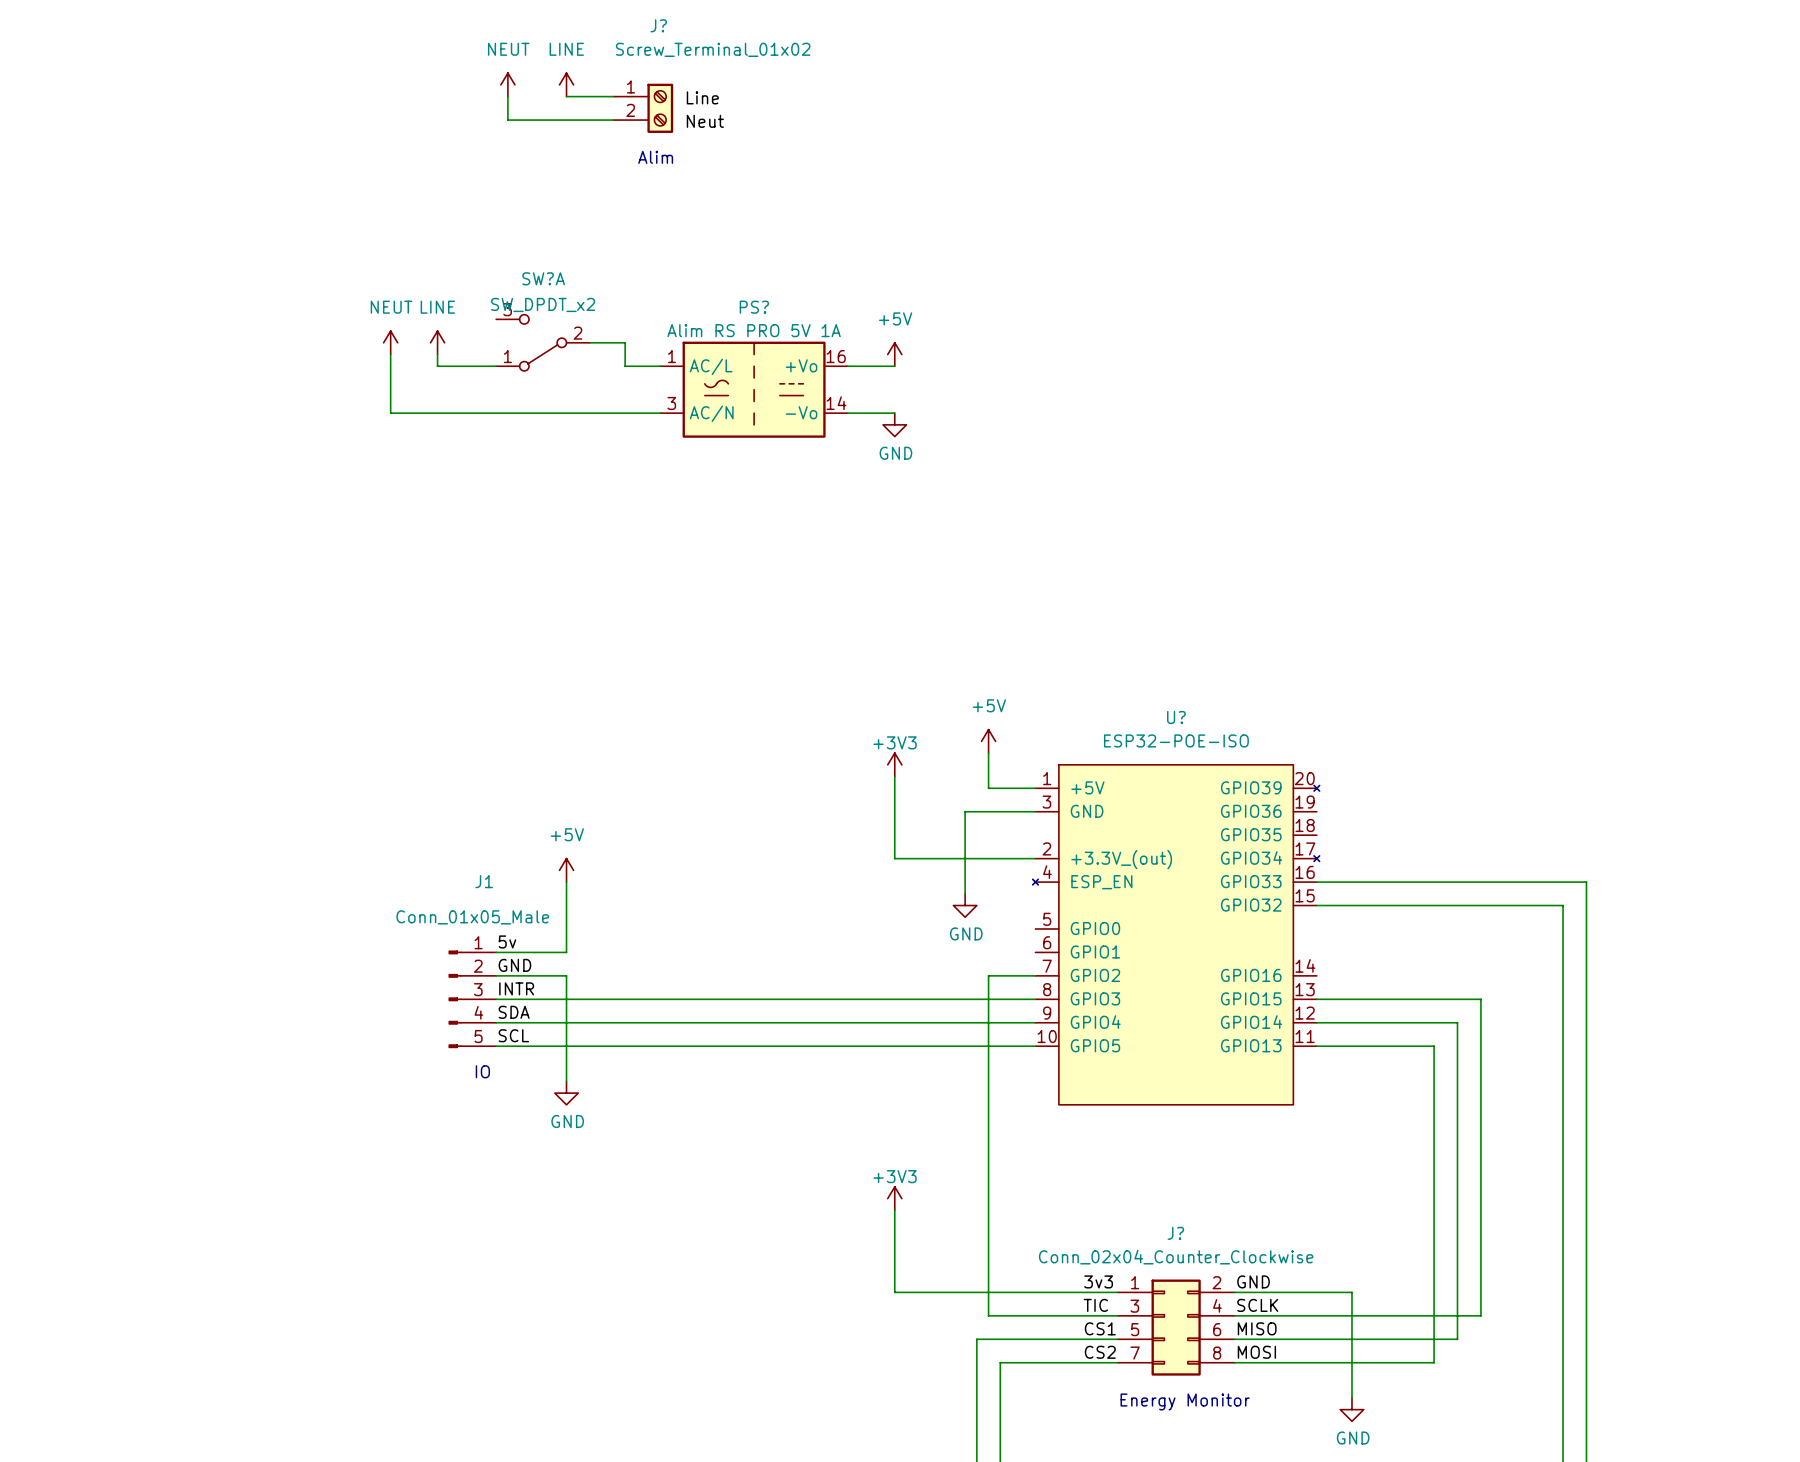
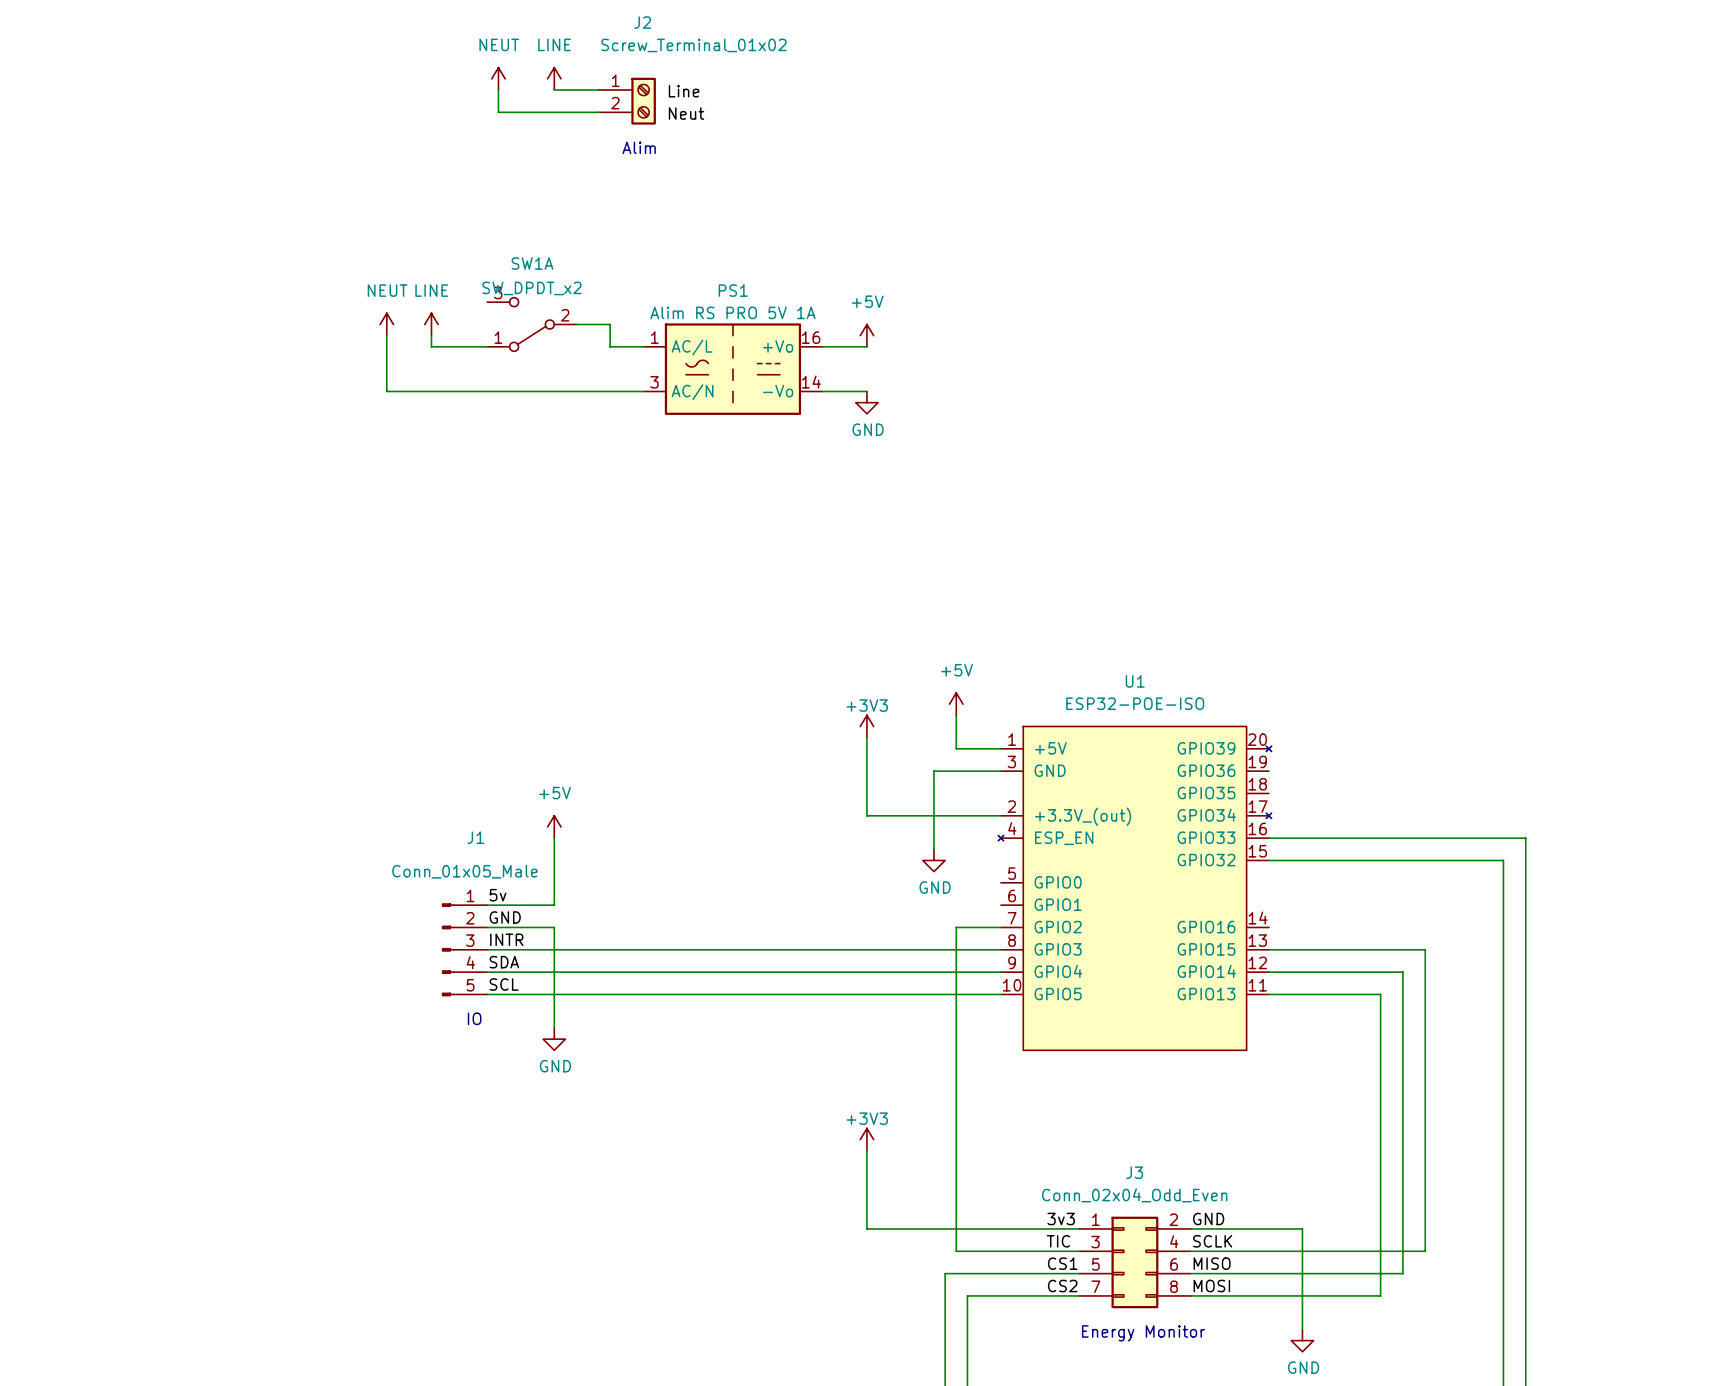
J? name: J? (658, 25) -> J2 (642, 22)
SW?A name: SW?A (543, 278) -> SW1A (532, 263)
PS? name: PS? (754, 307) -> PS1 (733, 290)
U? name: U? (1176, 717) -> U1 (1135, 681)
J? name: J? (1175, 1233) -> J3 (1134, 1172)
J? value: Conn_02x04_Counter_Clockwise (1176, 1257) -> Conn_02x04_Odd_Even (1134, 1195)

